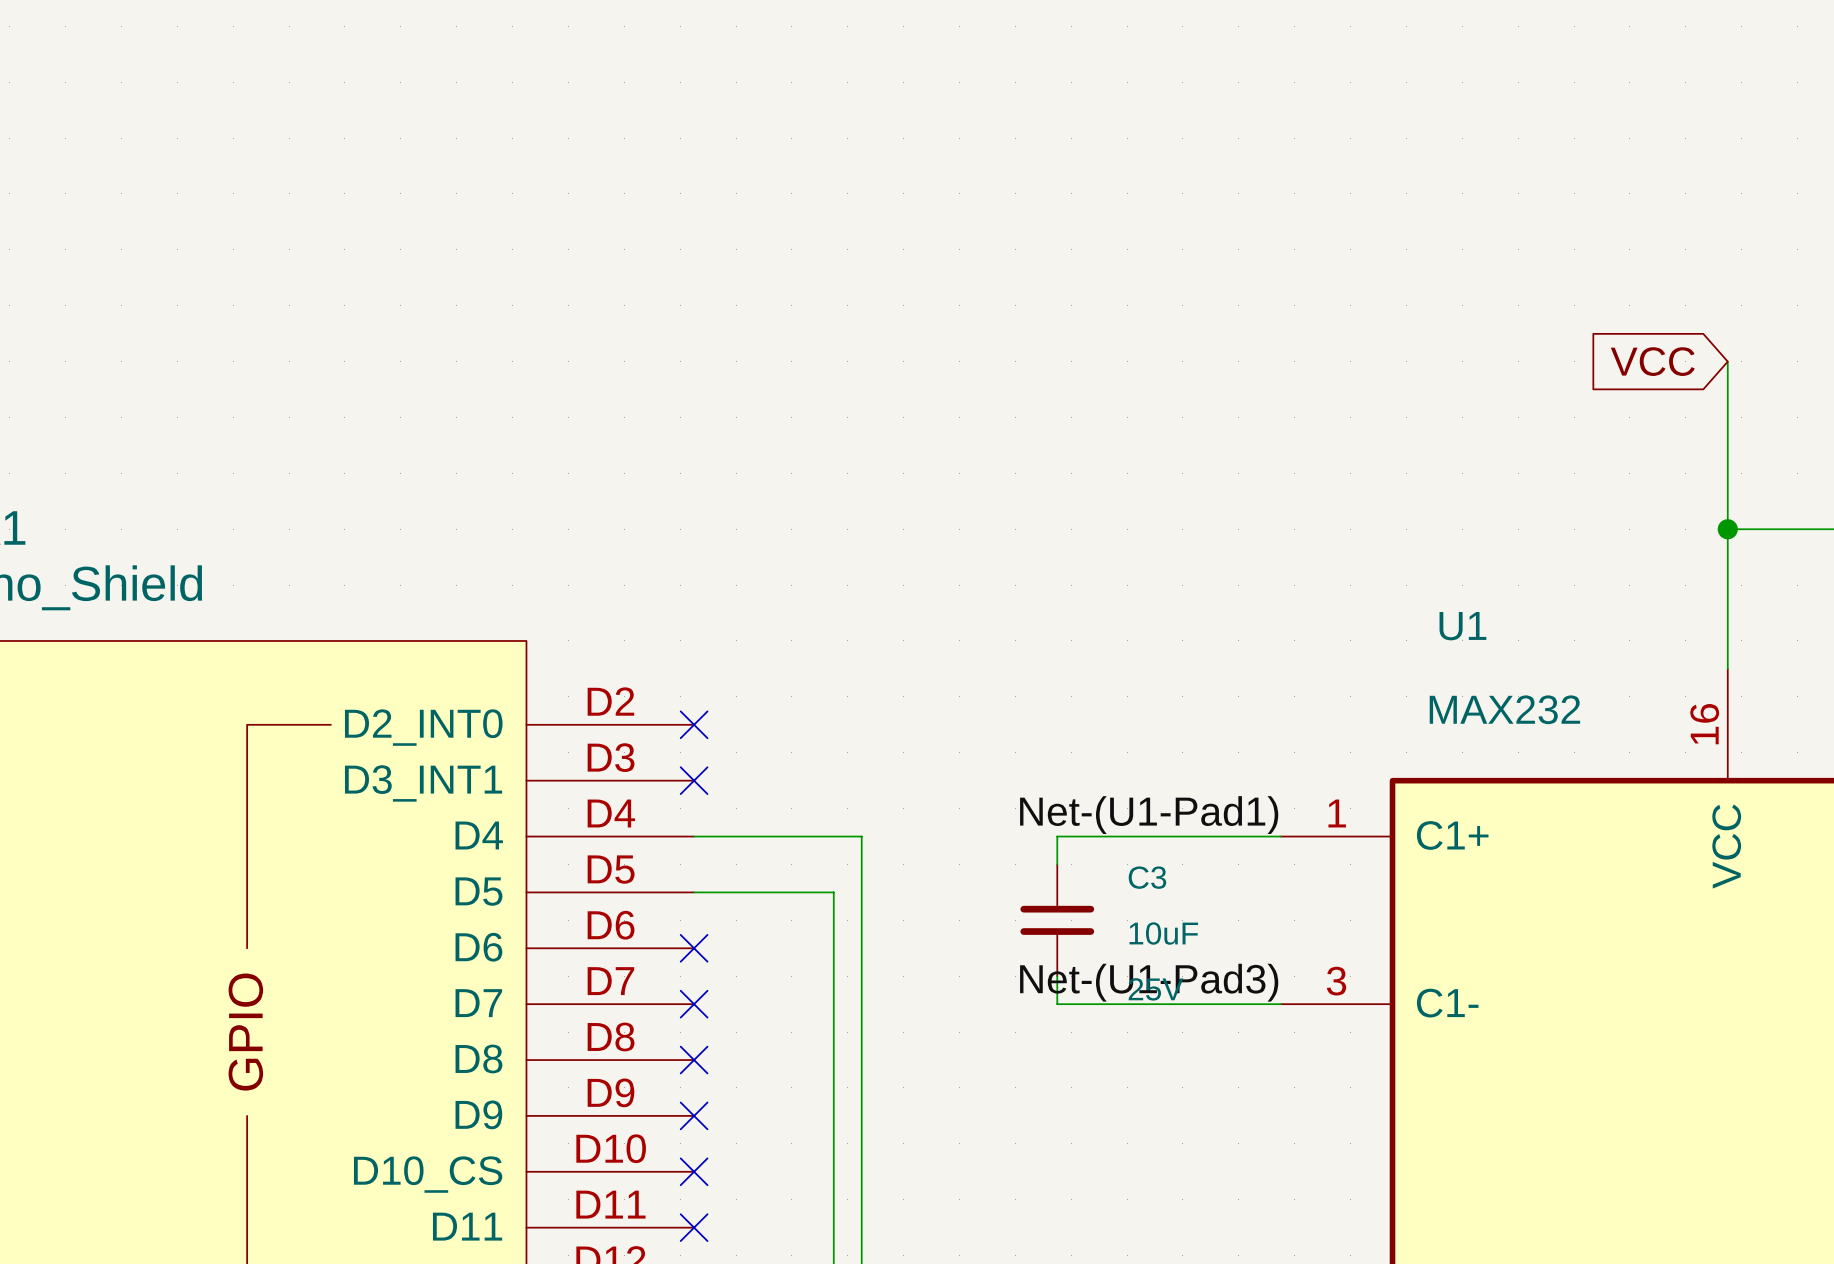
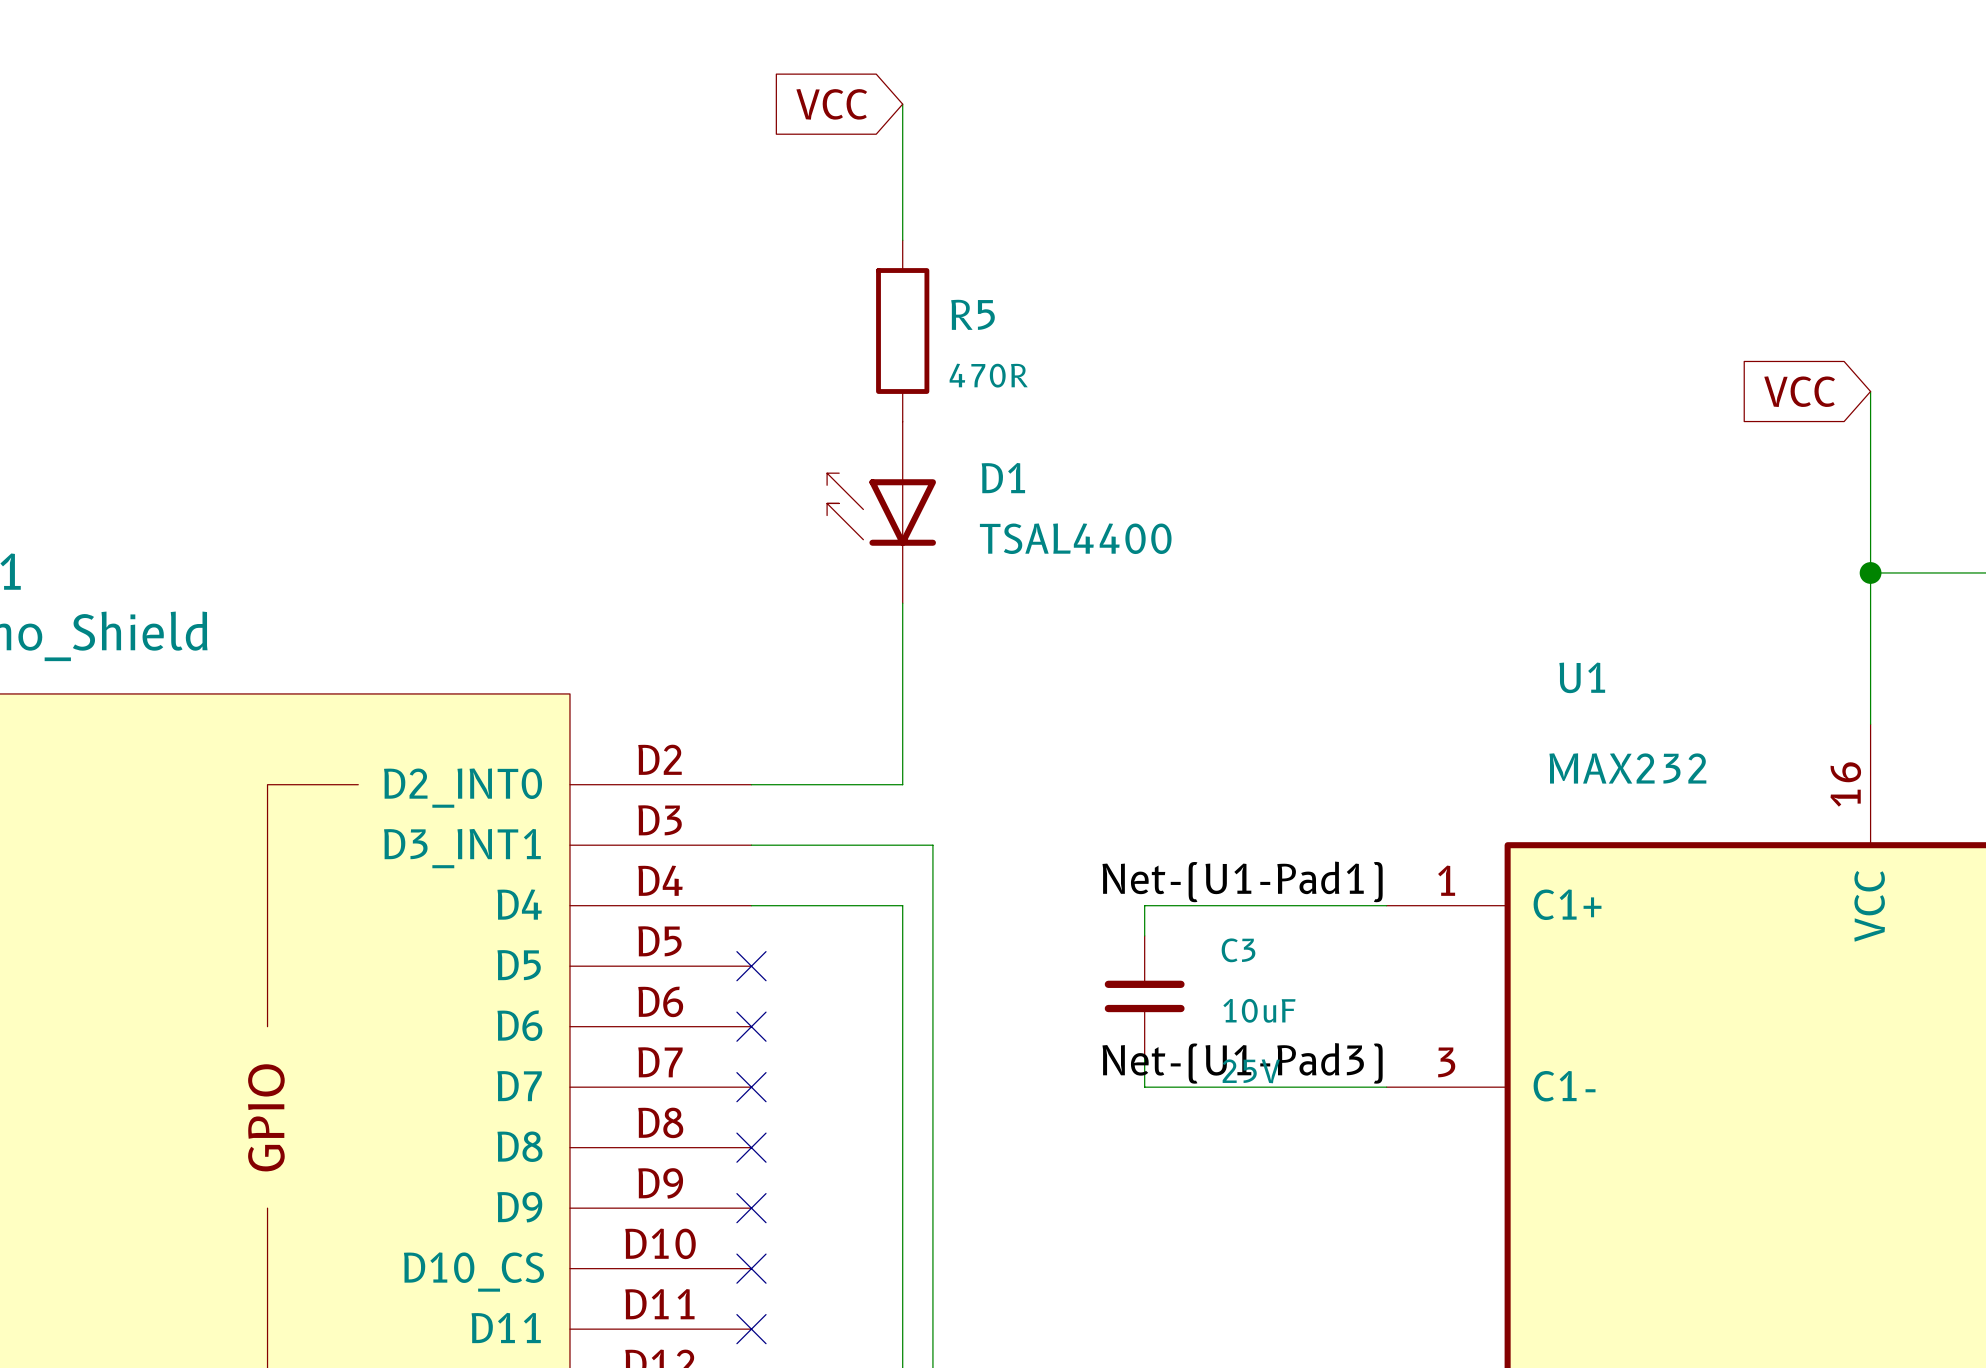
global label: none -> VCC (831, 104)
wire: none -> (902, 104) (902, 240)
R5: none -> (902, 331)
D1: none -> TSAL4400 (881, 512)
wire: none -> (902, 603) (902, 784) (751, 784)
no-connect mark: (694, 724) -> none
wire: none -> (751, 845) (932, 845) (932, 905)
no-connect mark: (694, 780) -> none
wire: (833, 836) (861, 836) -> (902, 905) (902, 966)
wire: (694, 892) (833, 892) -> none
no-connect mark: none -> (751, 966)

